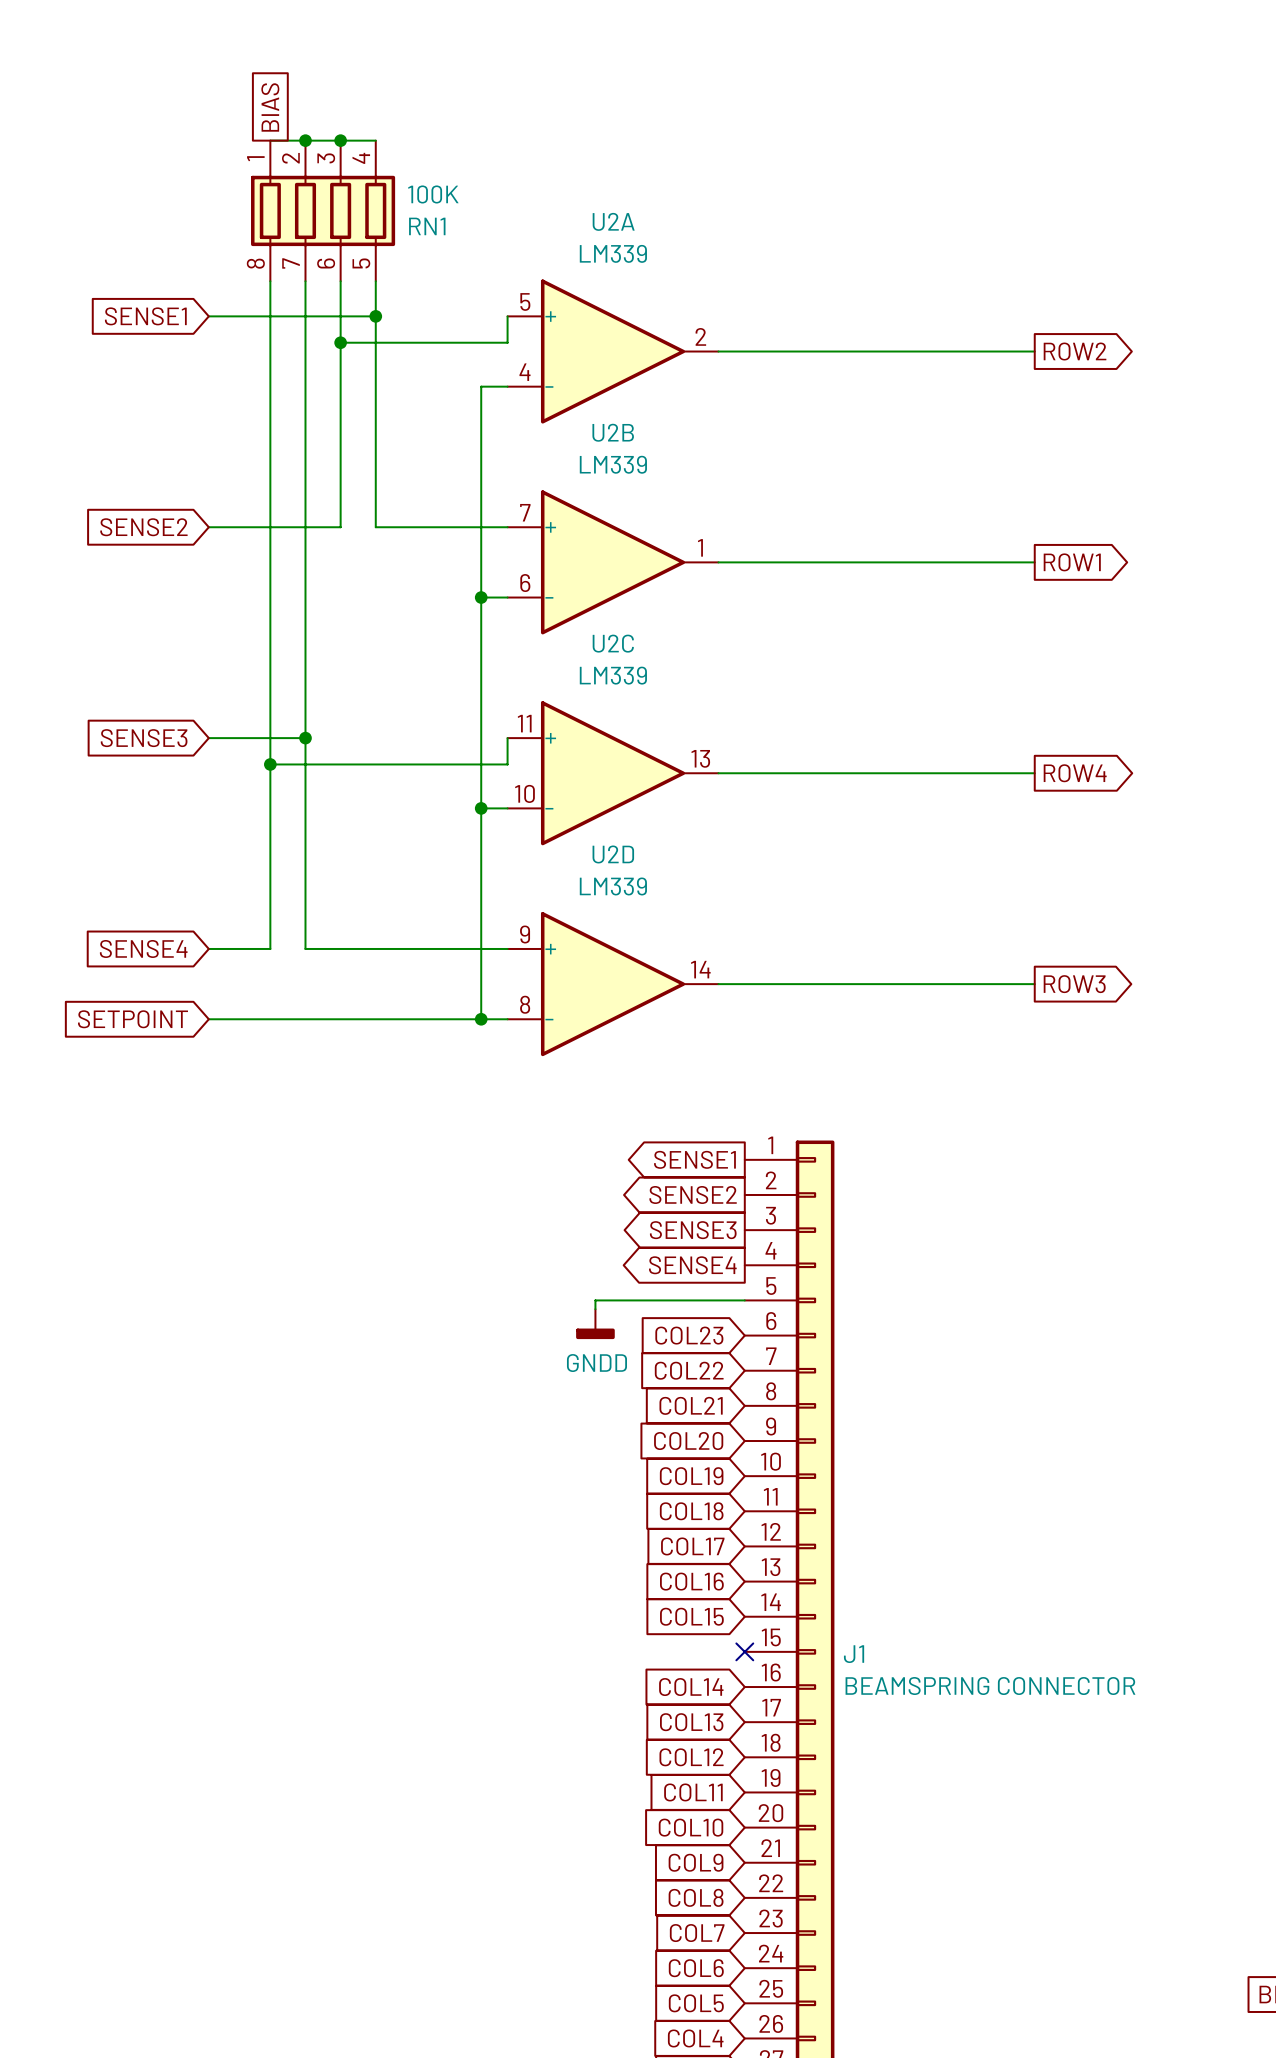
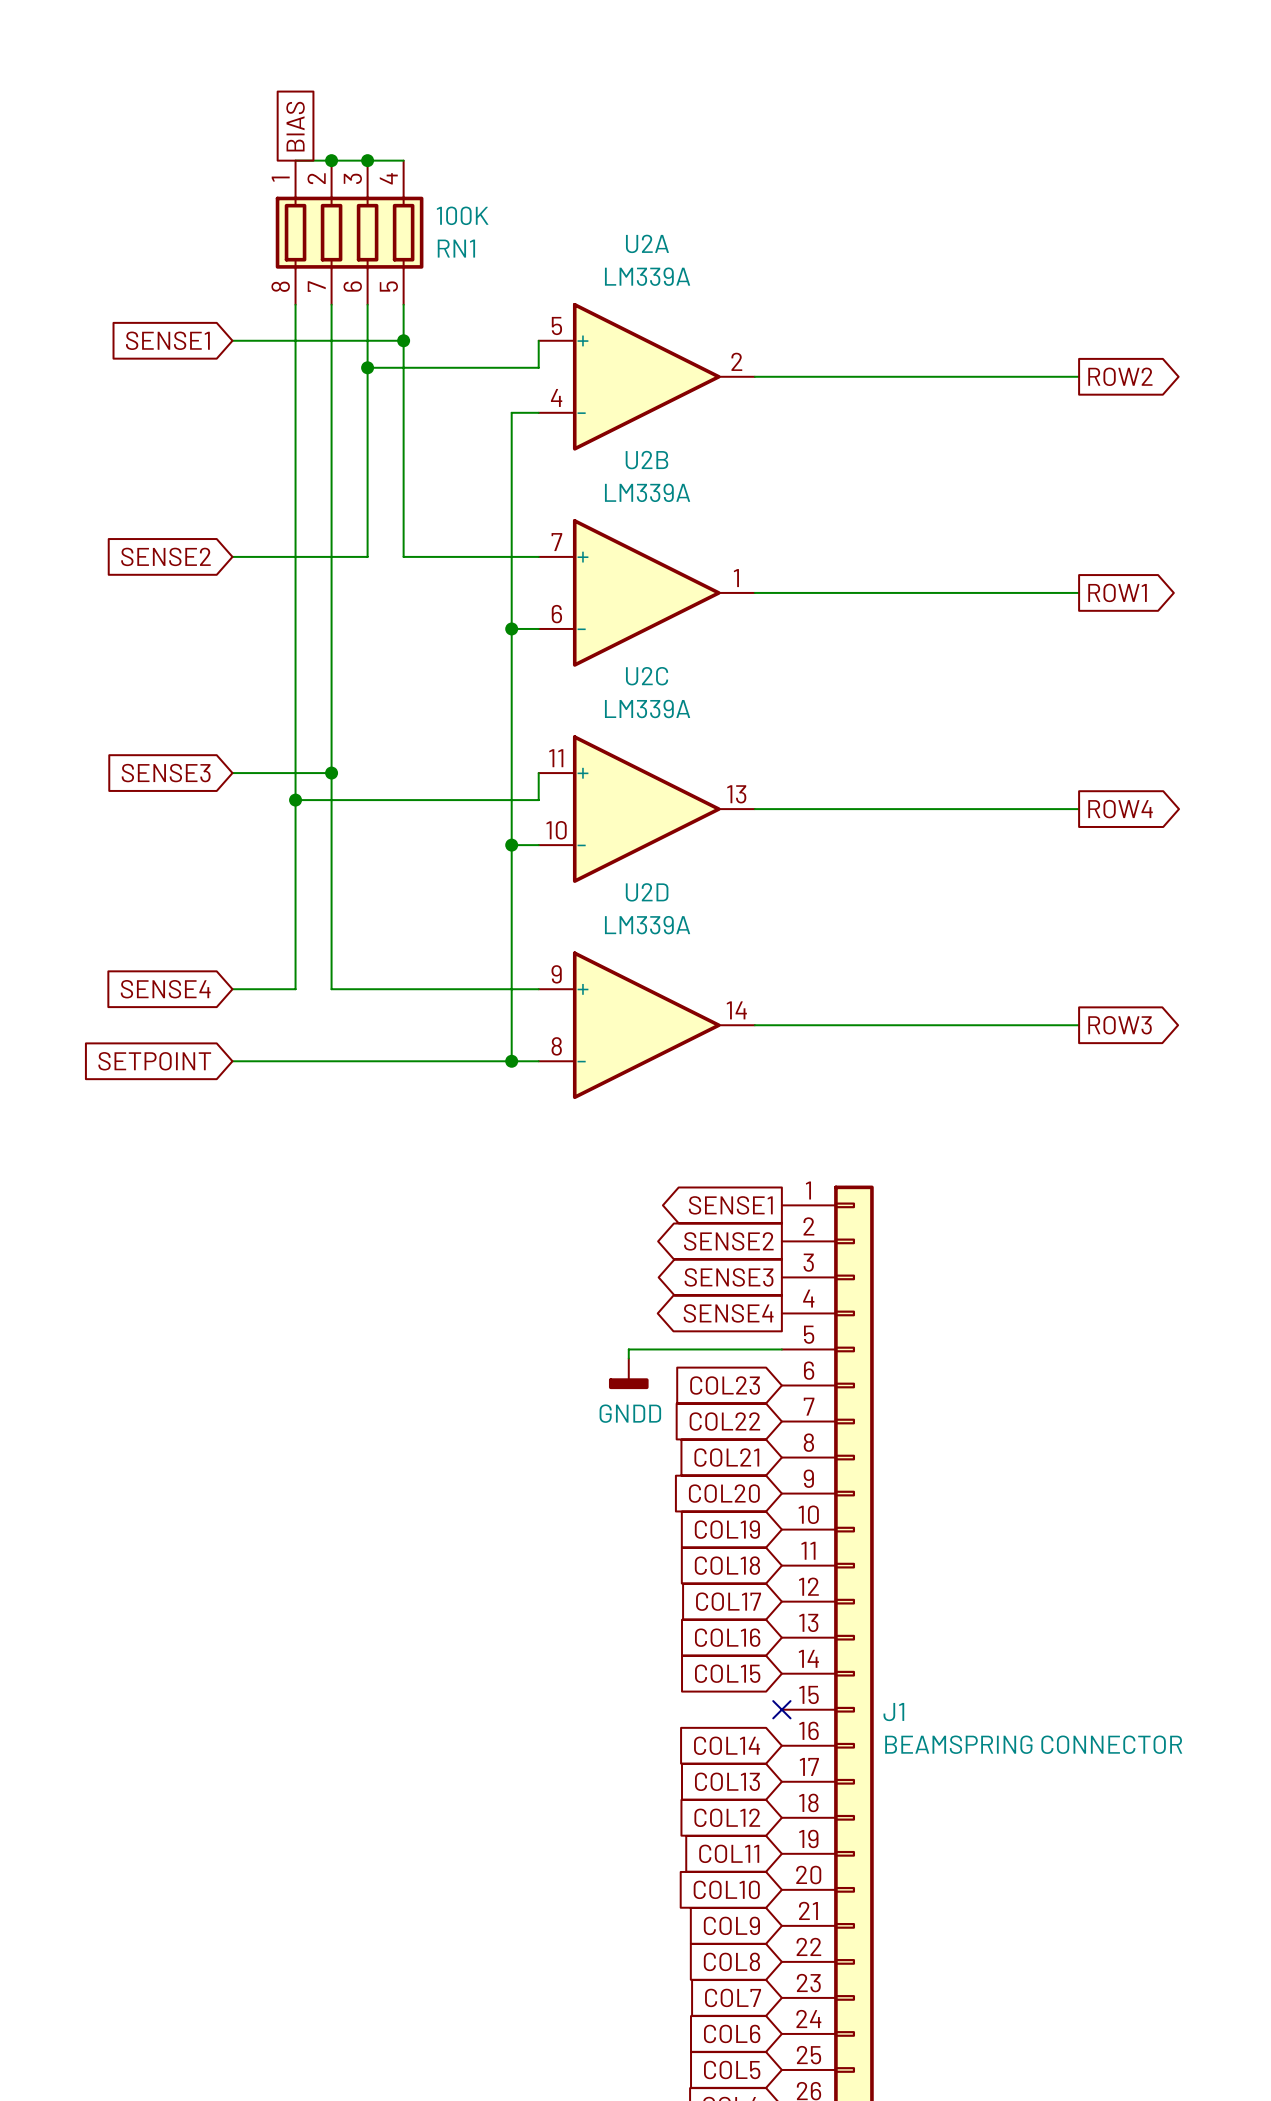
U2A value: LM339 (613, 253) -> LM339A (647, 276)
U2B value: LM339 (613, 464) -> LM339A (647, 492)
U2C value: LM339 (613, 675) -> LM339A (647, 709)
U2D value: LM339 (613, 886) -> LM339A (647, 925)

